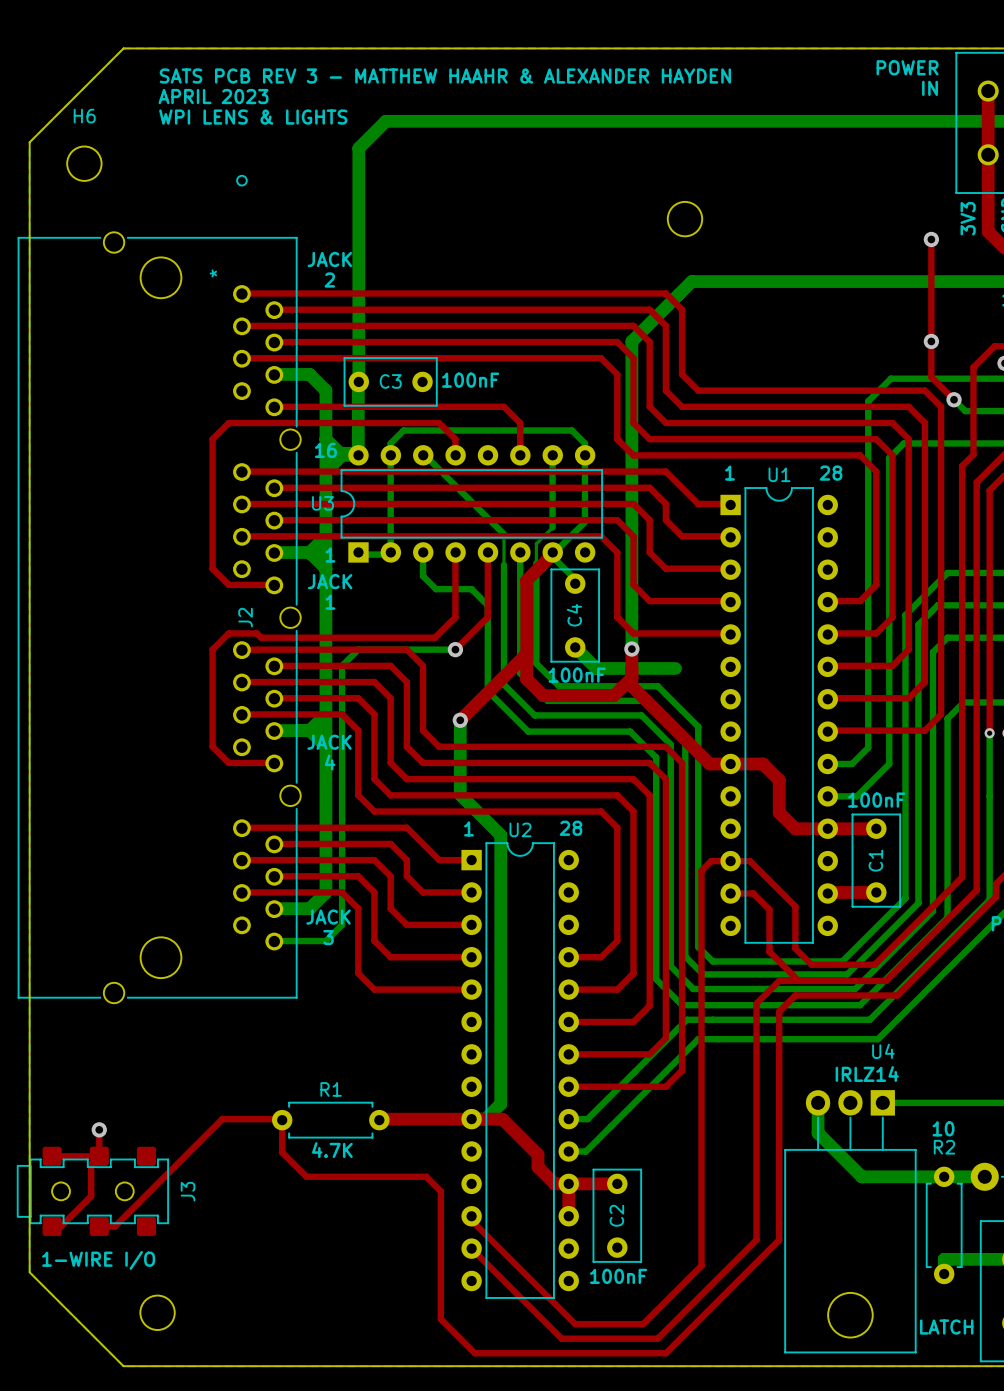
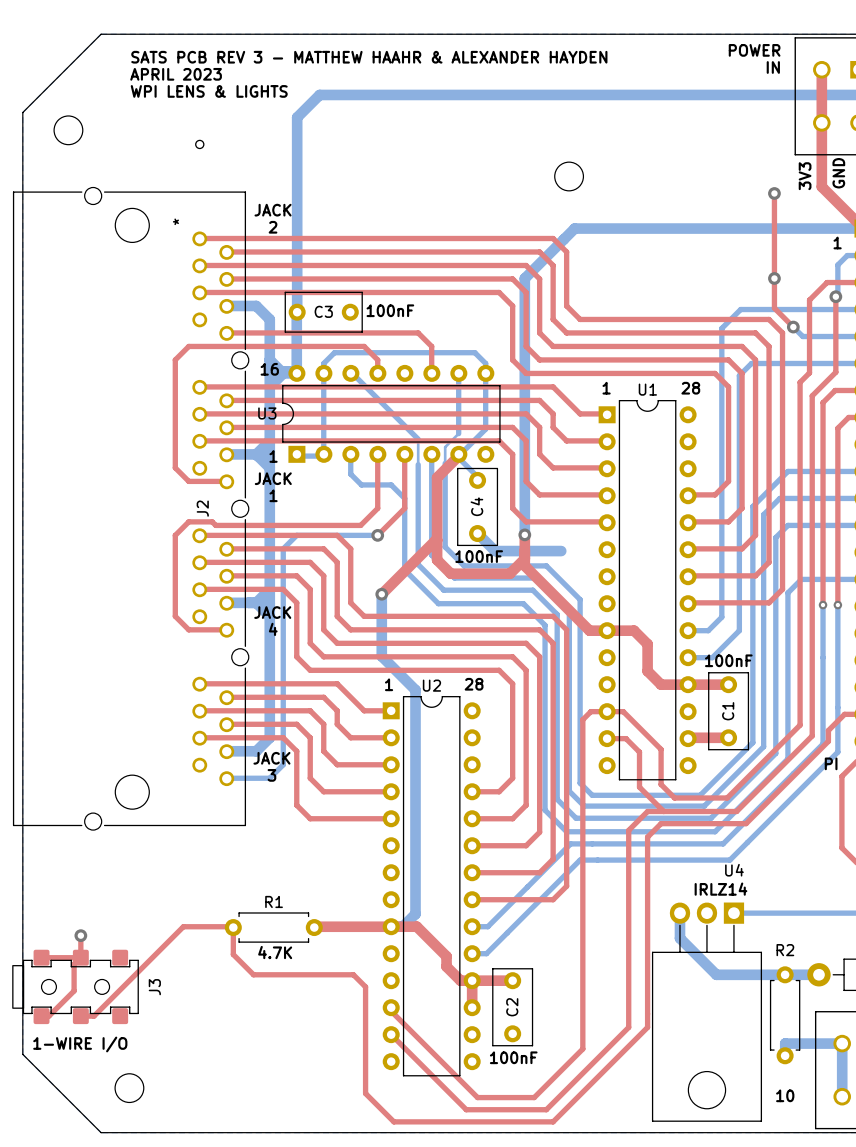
H6 name: H6 (84, 116) -> none
text: 10 (943, 1128) -> none
text: LATCH (946, 1327) -> 10 (785, 1095)

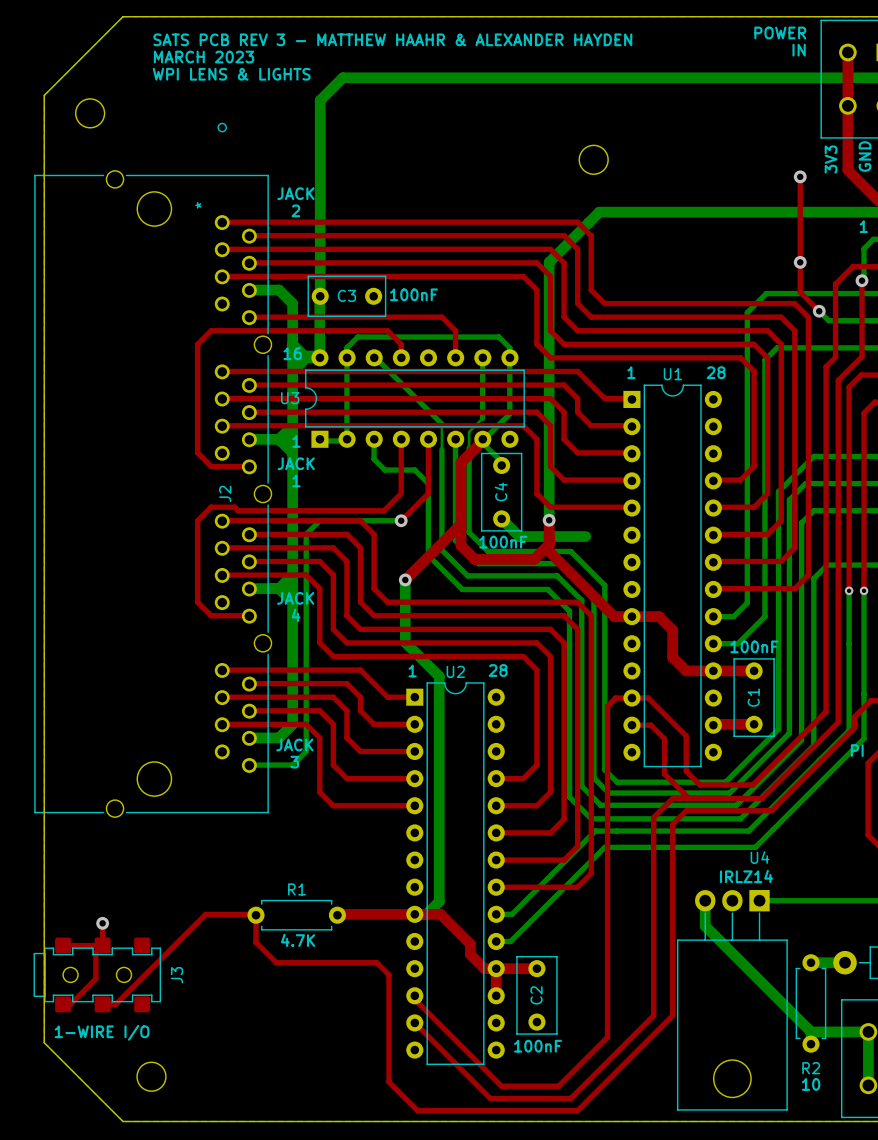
text: APRIL 2023 (176, 74) -> MARCH 2023 (204, 57)
R2 name position: R2 (785, 950) -> R2 (811, 1068)
bottom track: (716, 974) (785, 974) -> (741, 962) (811, 1031)

